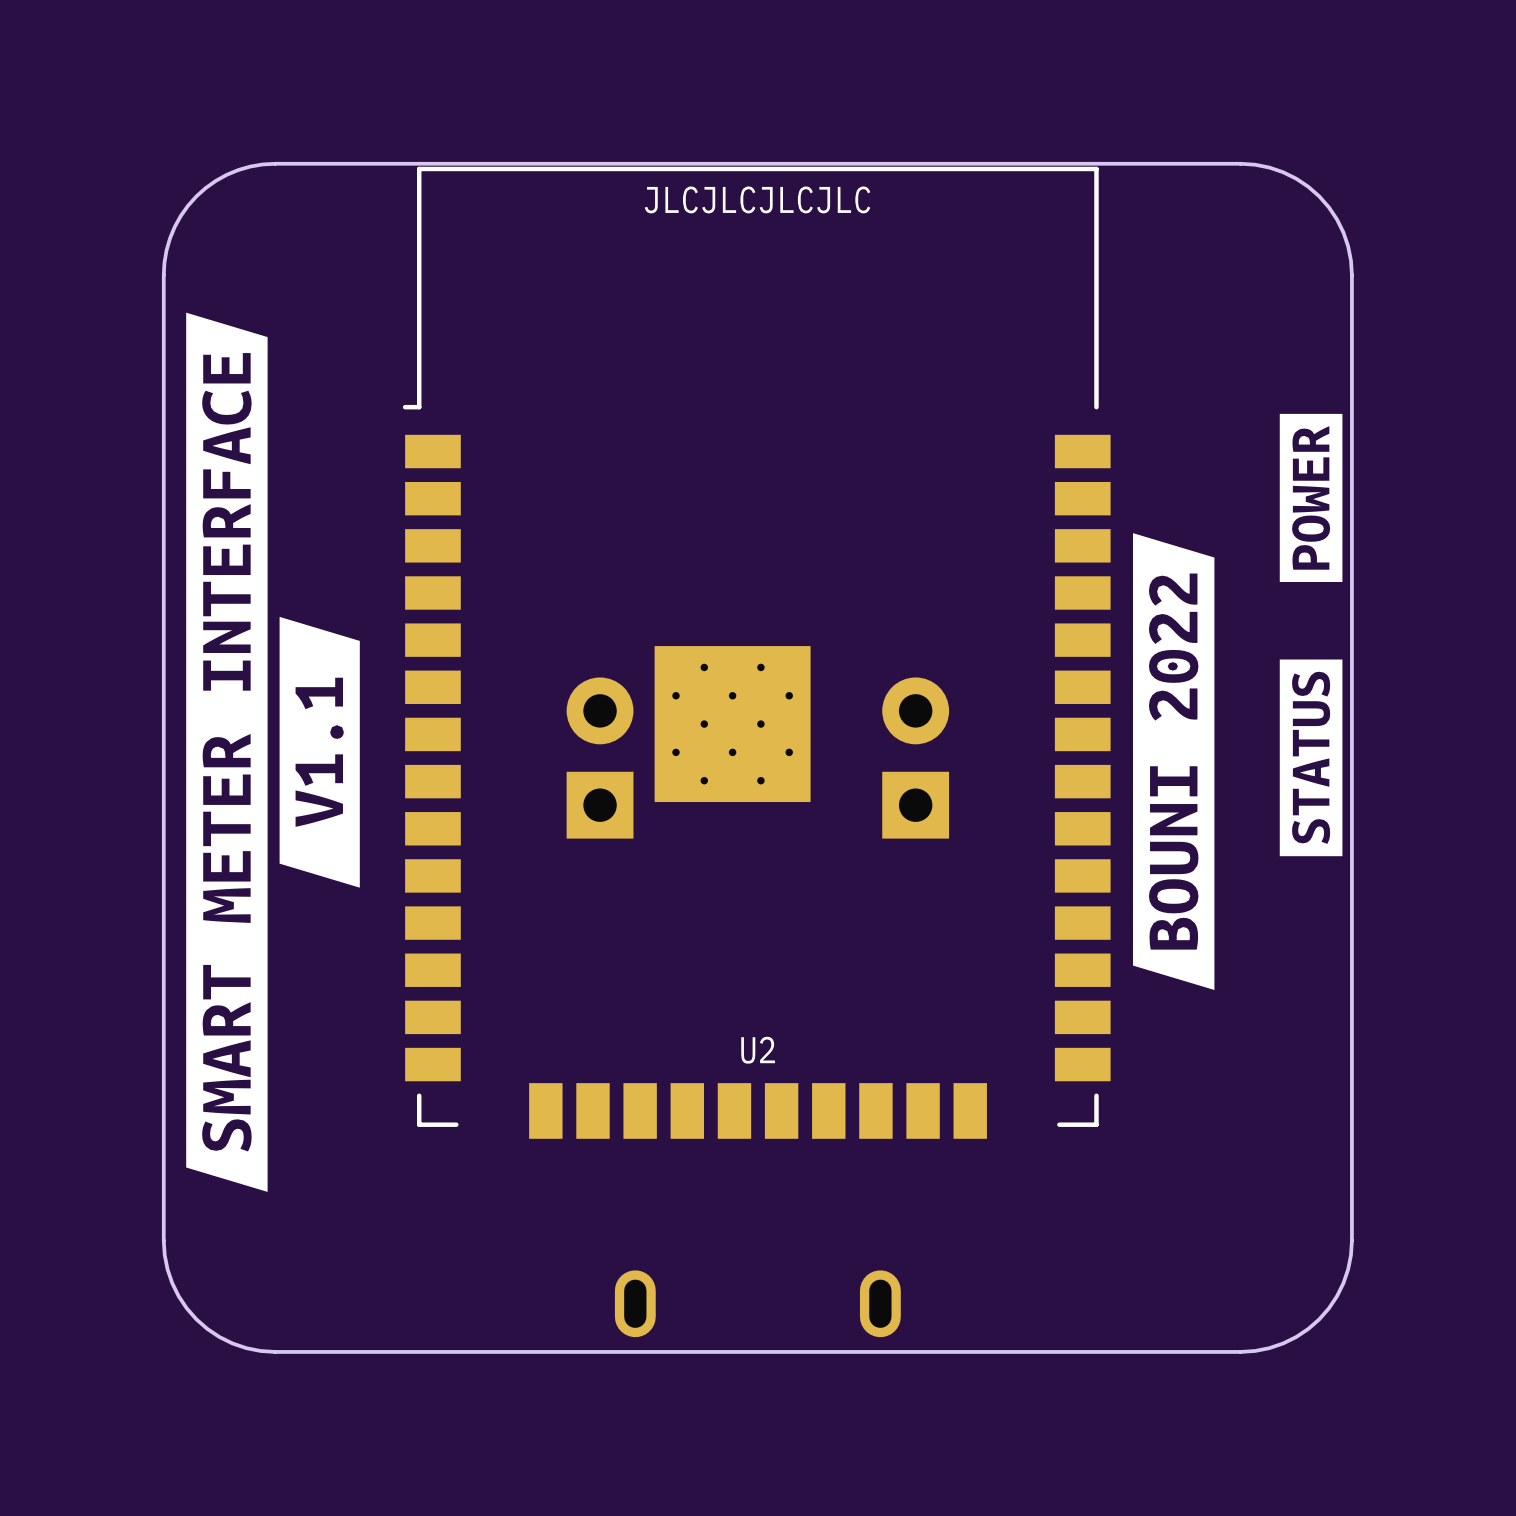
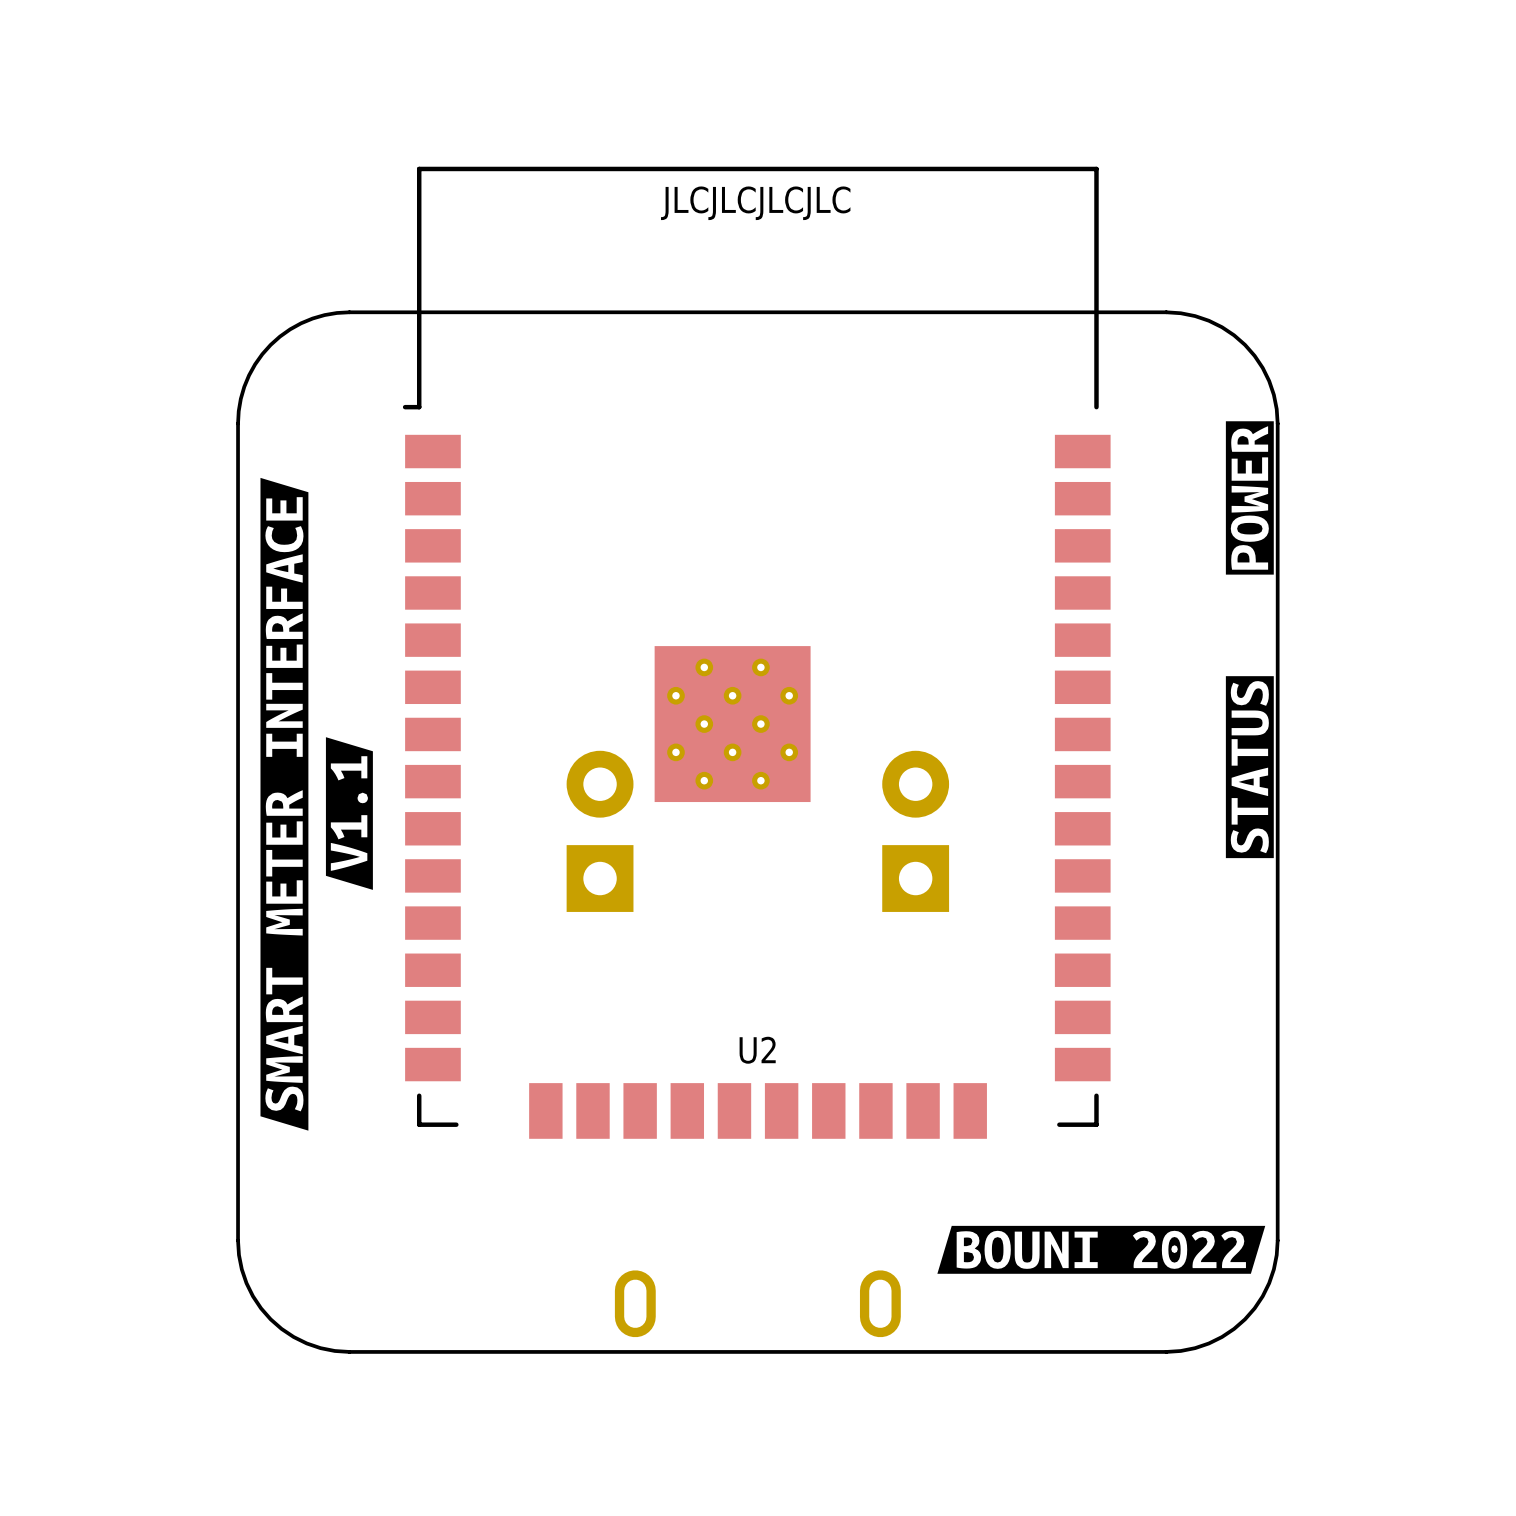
drawing: [186, 312, 360, 1192] -> none
drawing: [1279, 413, 1343, 582] -> none
drawing: none -> [1225, 421, 1274, 575]
drawing: none -> [260, 477, 373, 1131]
drawing: [1133, 533, 1215, 991] -> none
drawing: [1279, 659, 1343, 857] -> none
drawing: none -> [1225, 676, 1274, 859]
part position: (600, 758) -> (600, 831)
part position: (915, 758) -> (915, 831)
drawing: none -> [937, 1225, 1266, 1274]
board edge: (349, 1351) (260, 1350) (232, 1343) (219, 1337) (196, 1319) (178, 1296) (172, 1283) (164, 1255) (164, 262) (174, 226) (196, 196) (226, 174) (262, 164) (1240, 163) (1269, 167) (1296, 178) (1308, 186) (1328, 207) (1343, 232) (1348, 246) (1351, 275) (1350, 1255) (1343, 1283) (1328, 1308) (1319, 1319) (1296, 1337) (1283, 1343) (1255, 1350) (1166, 1351) -> (349, 1351) (320, 1348) (306, 1343) (293, 1337) (270, 1319) (252, 1296) (241, 1269) (238, 1255) (238, 423) (244, 386) (255, 364) (270, 344) (301, 323) (324, 315) (349, 312) (1166, 312) (1180, 313) (1208, 320) (1234, 335) (1254, 355) (1269, 381) (1273, 394) (1277, 423) (1276, 1255) (1273, 1269) (1262, 1296) (1254, 1308) (1234, 1328) (1221, 1337) (1195, 1348) (1166, 1351)

